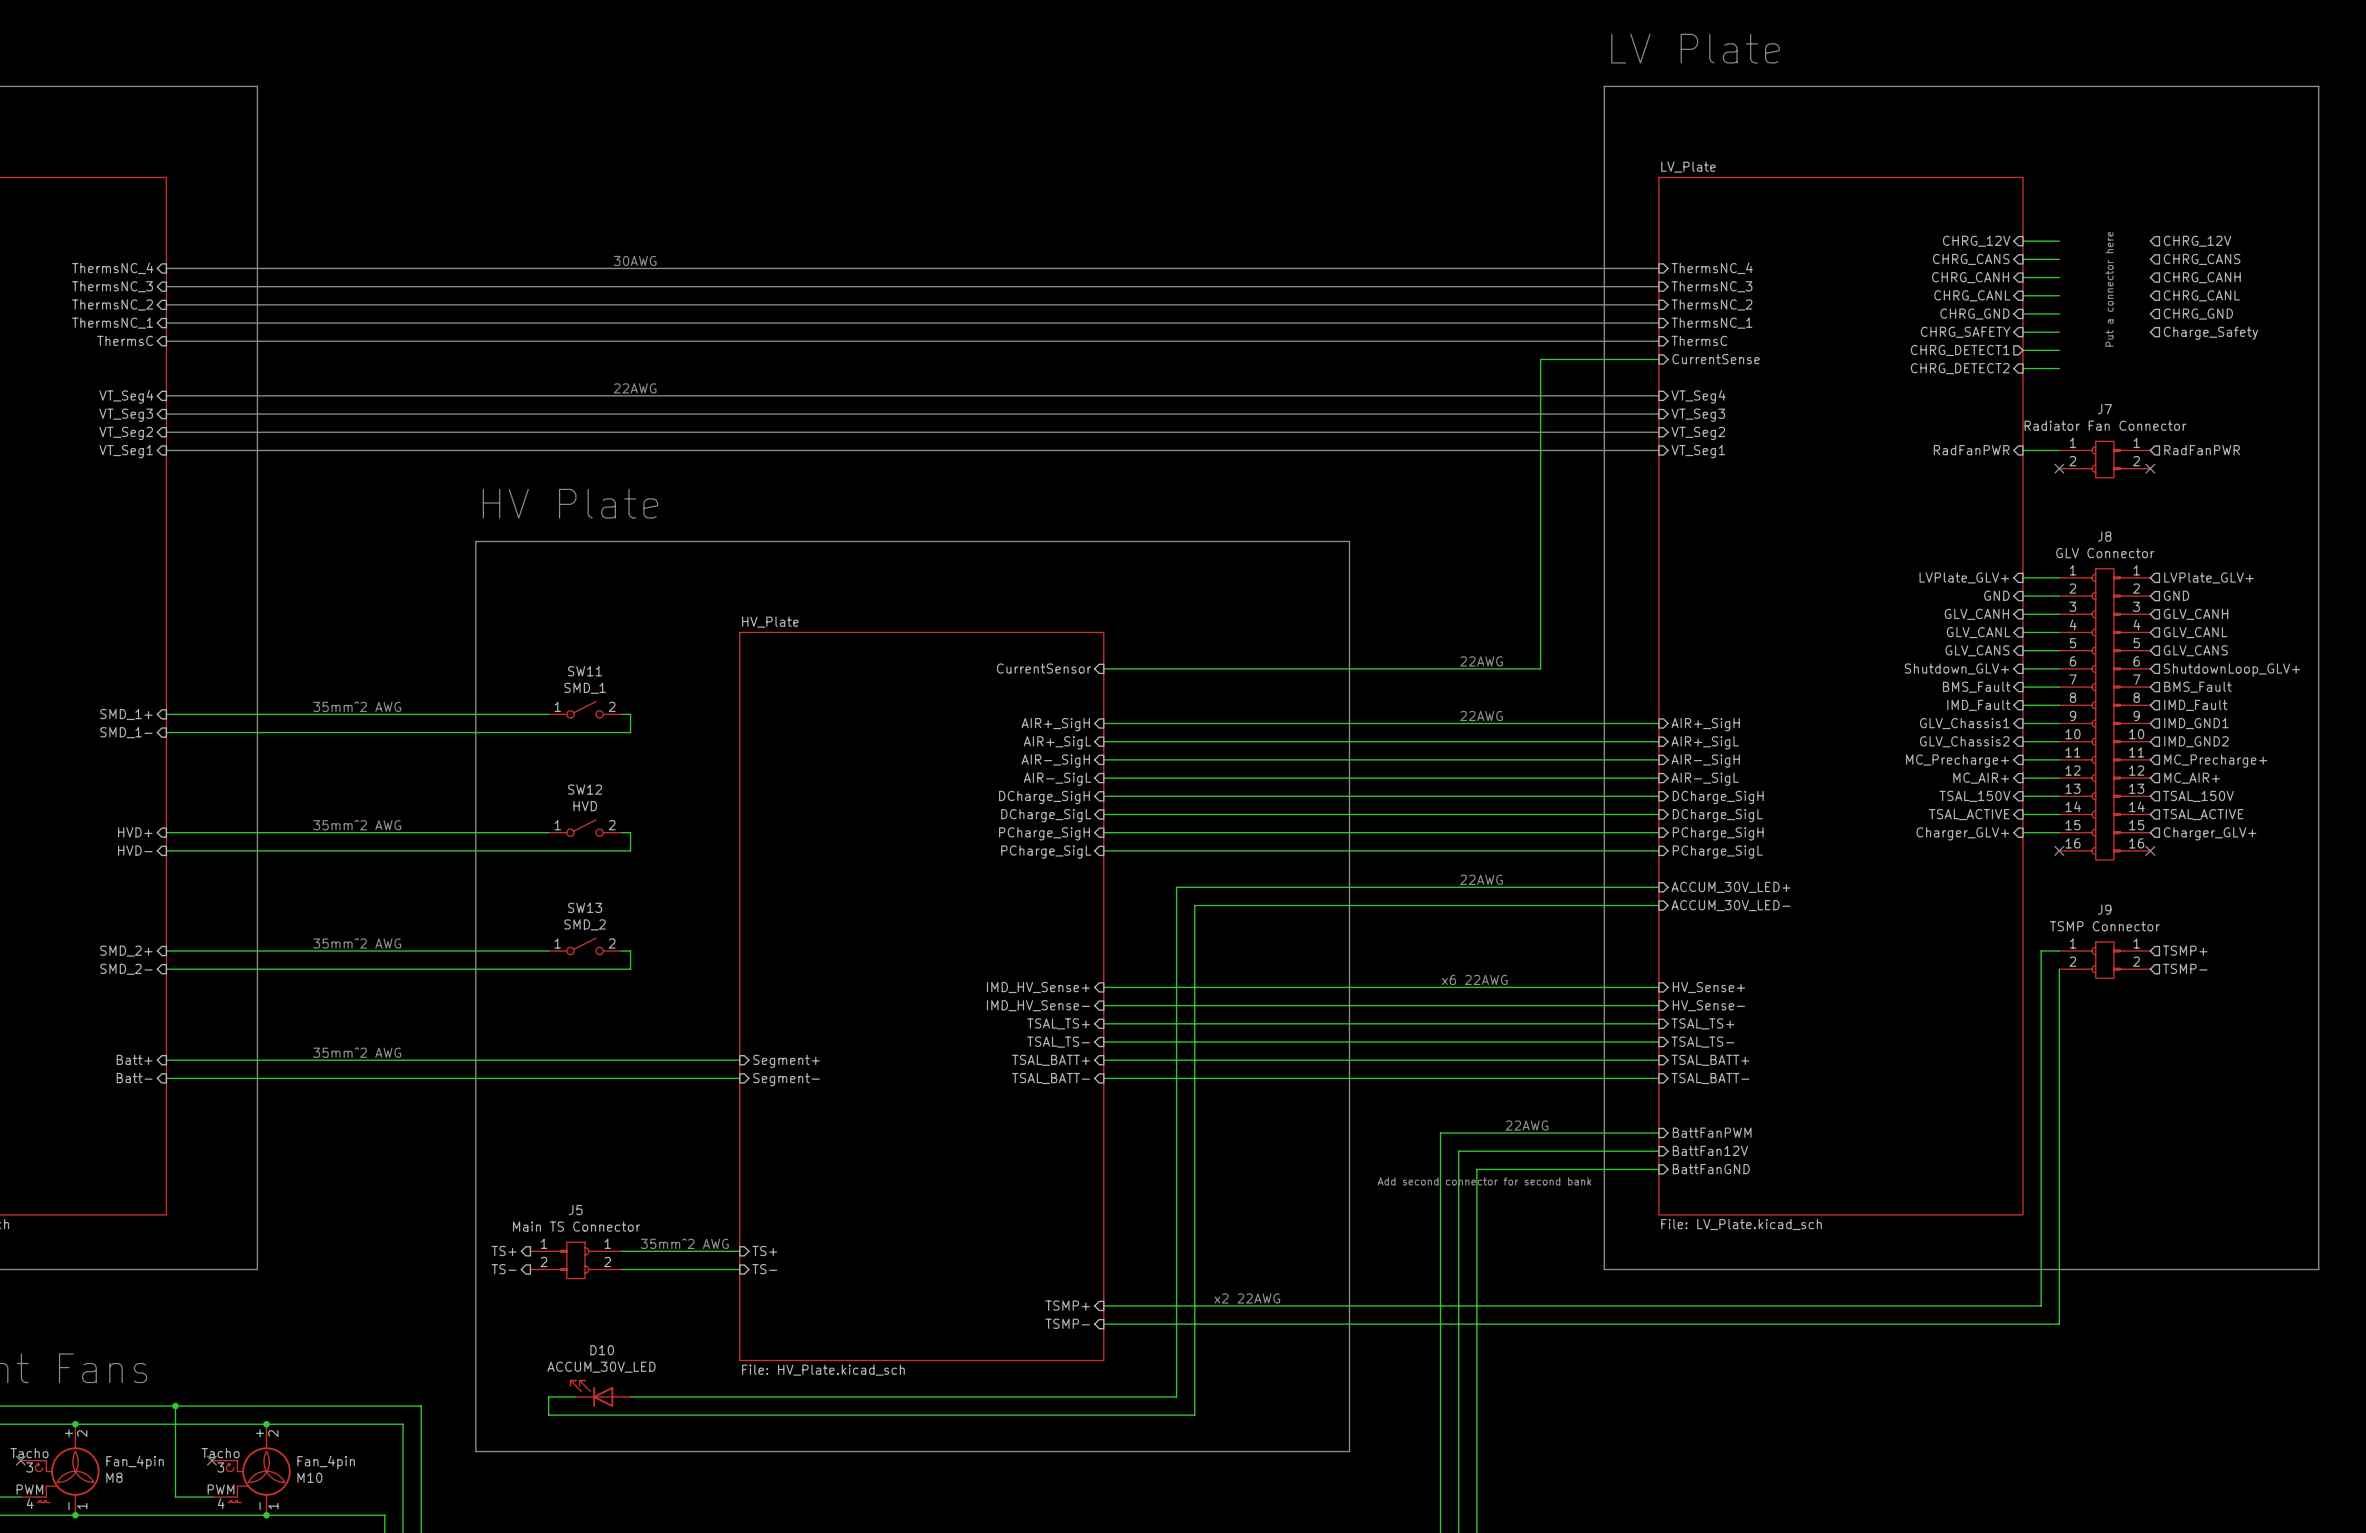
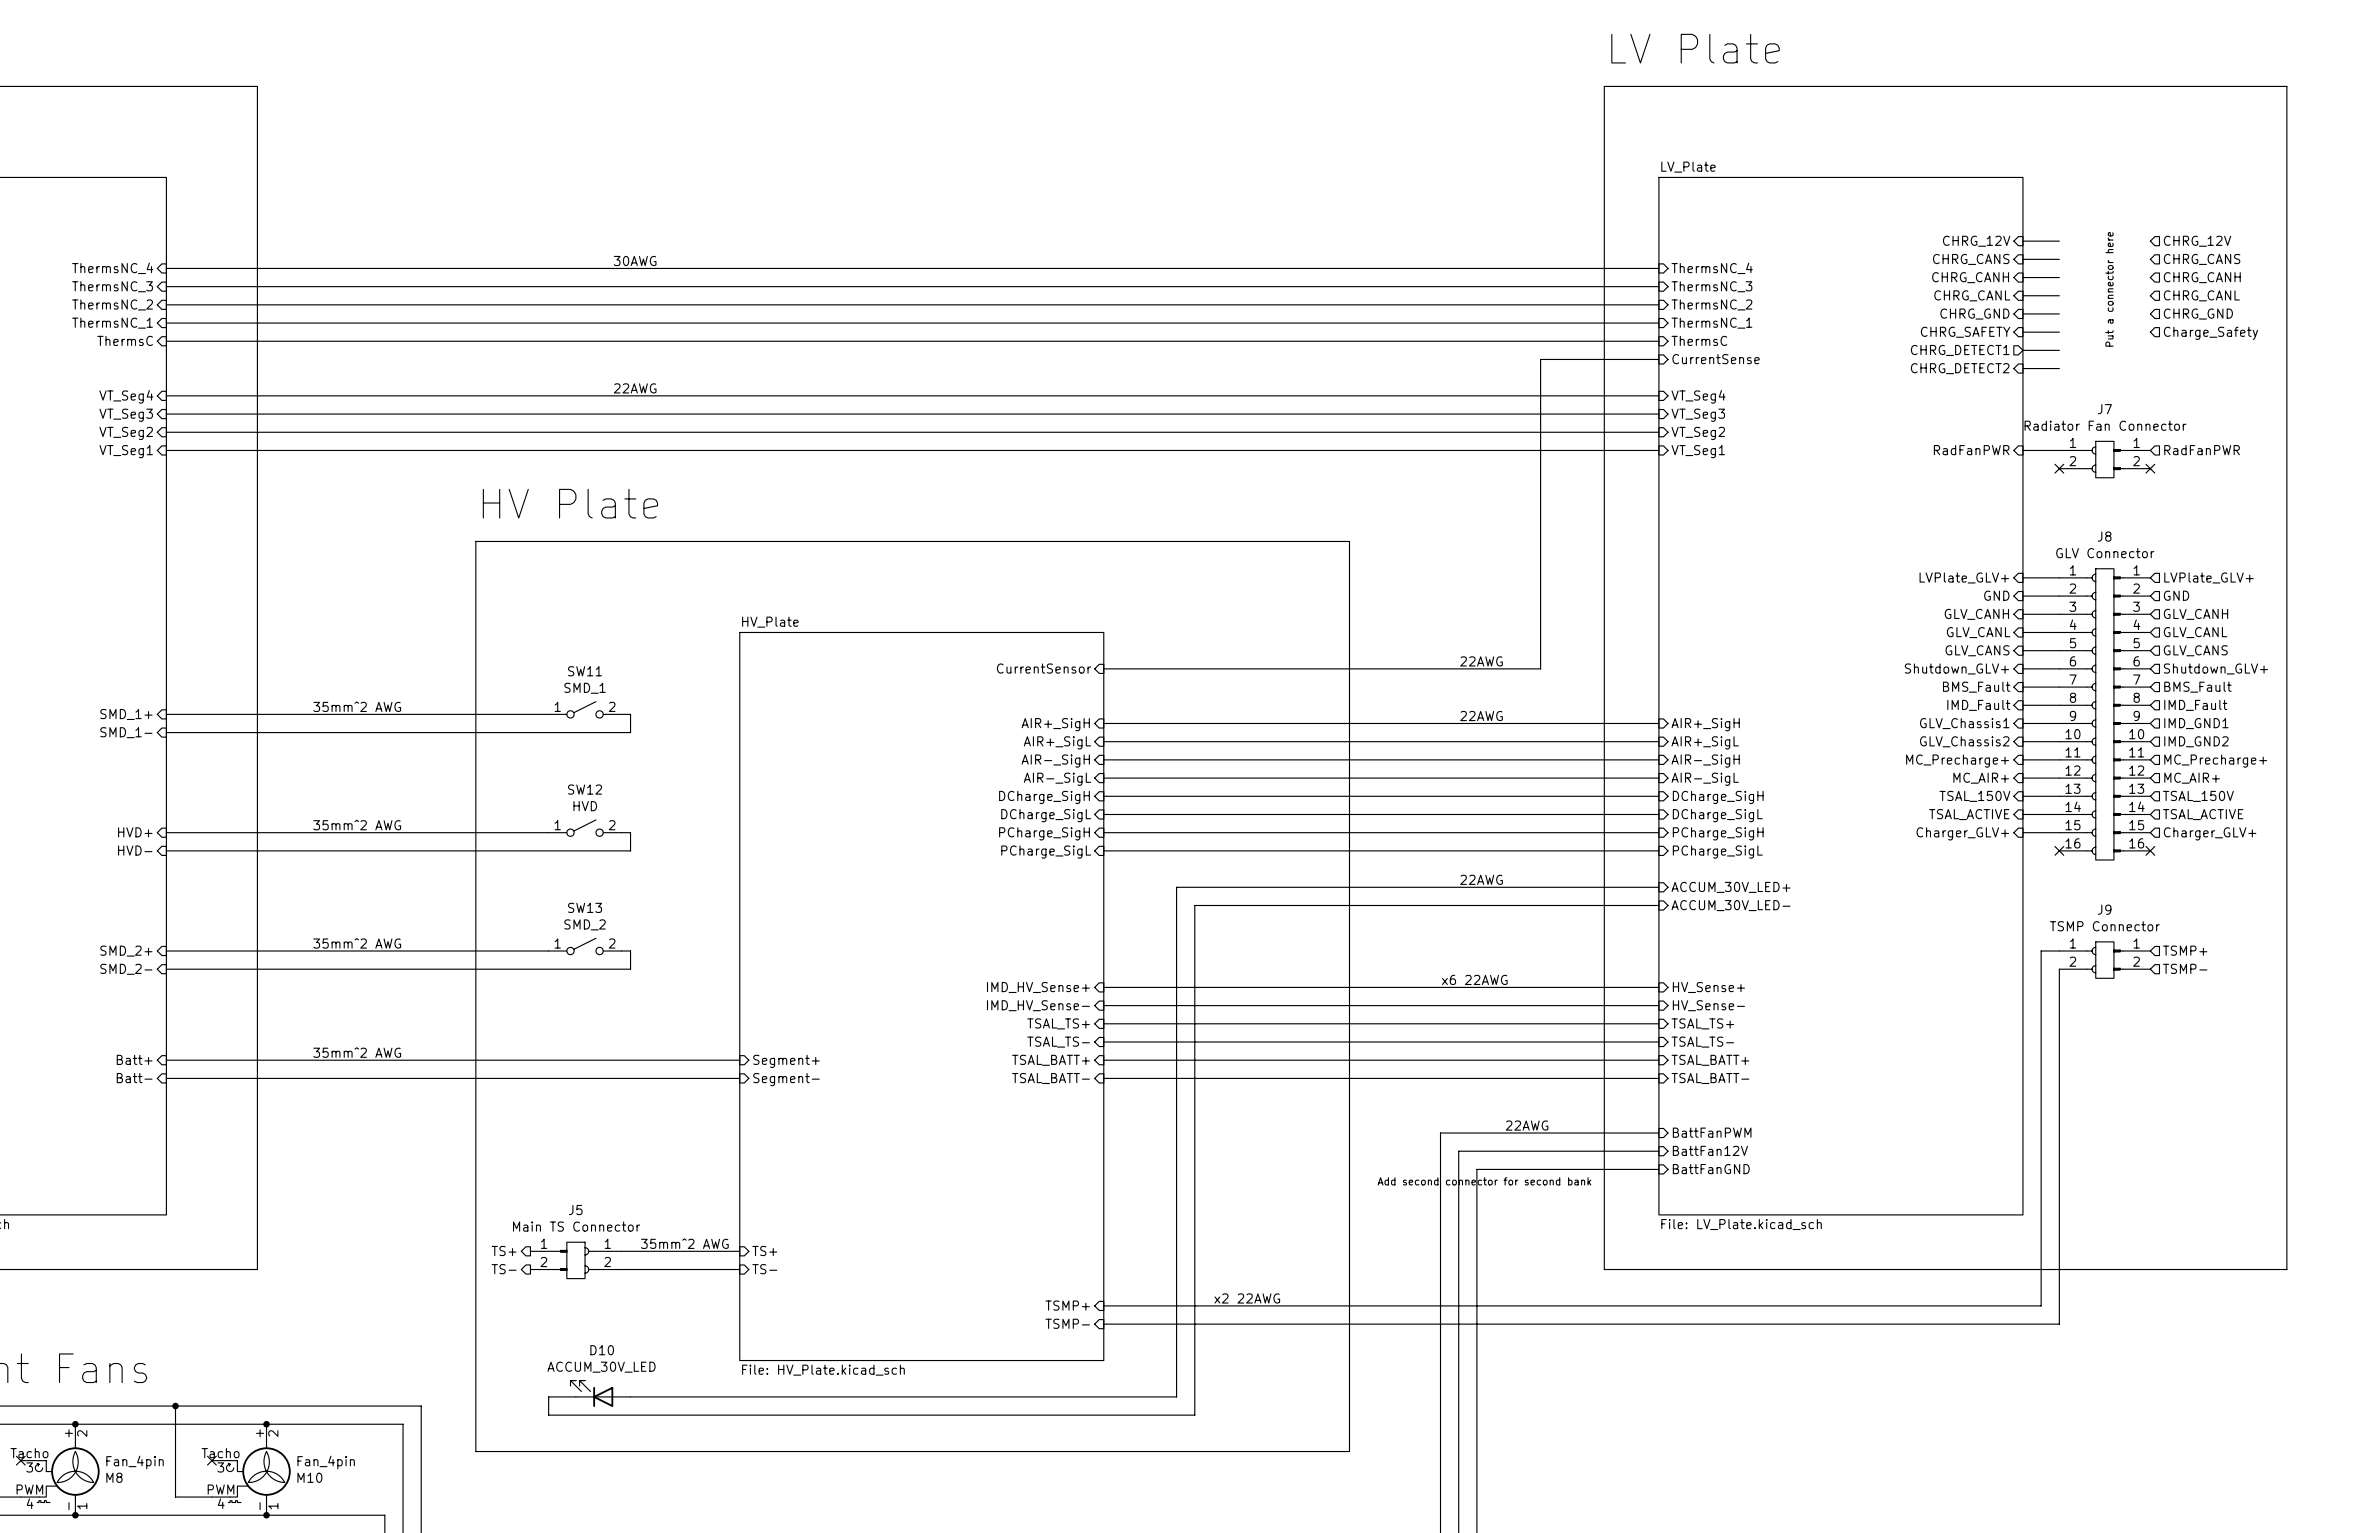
line: (2286, 86) (2318, 86) (2318, 1269) (2286, 1269) -> (2286, 86) (2286, 1269)
hierarchical label: ShutdownLoop_GLV+ (2231, 670) -> Shutdown_GLV+ (2215, 668)

